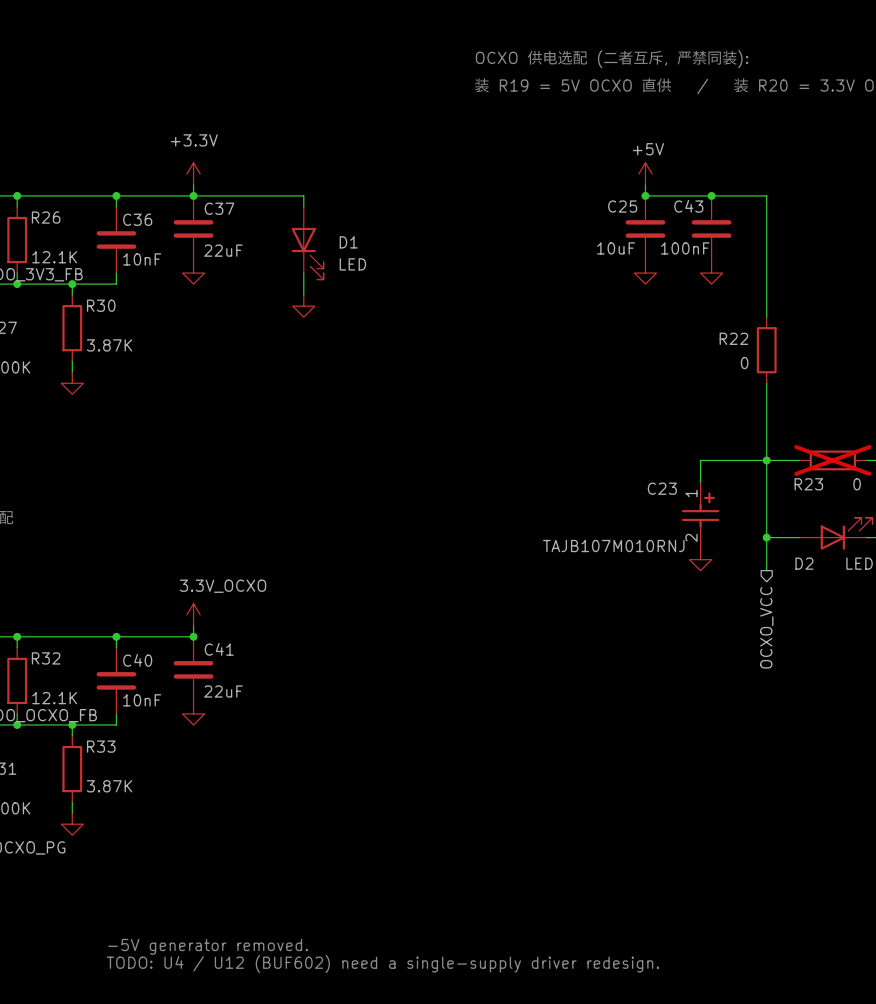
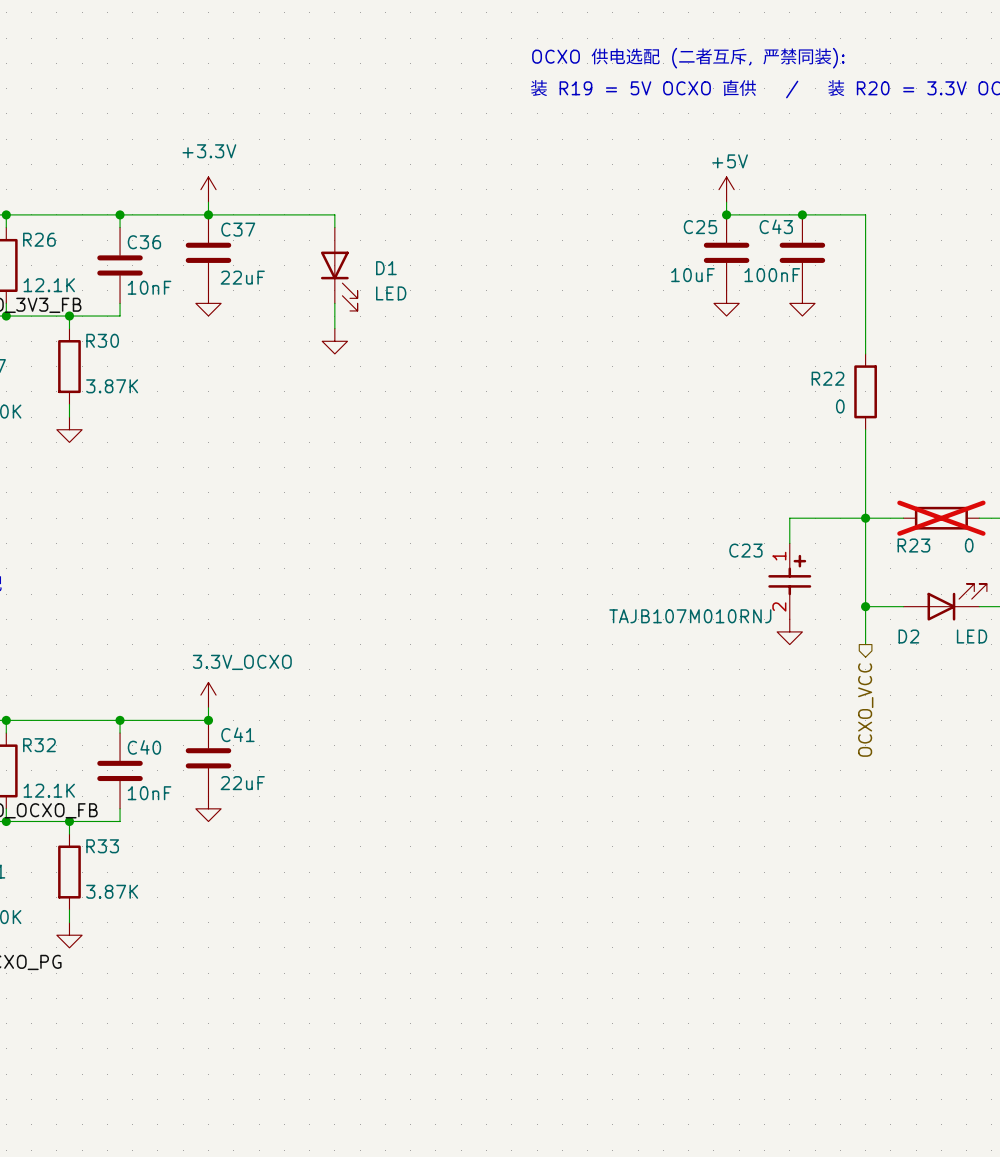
text: -5V generator removed. (208, 946) -> none
text: TODO: U4 / U12 (BUF602) need a single-supply driver redesign. (382, 964) -> none

